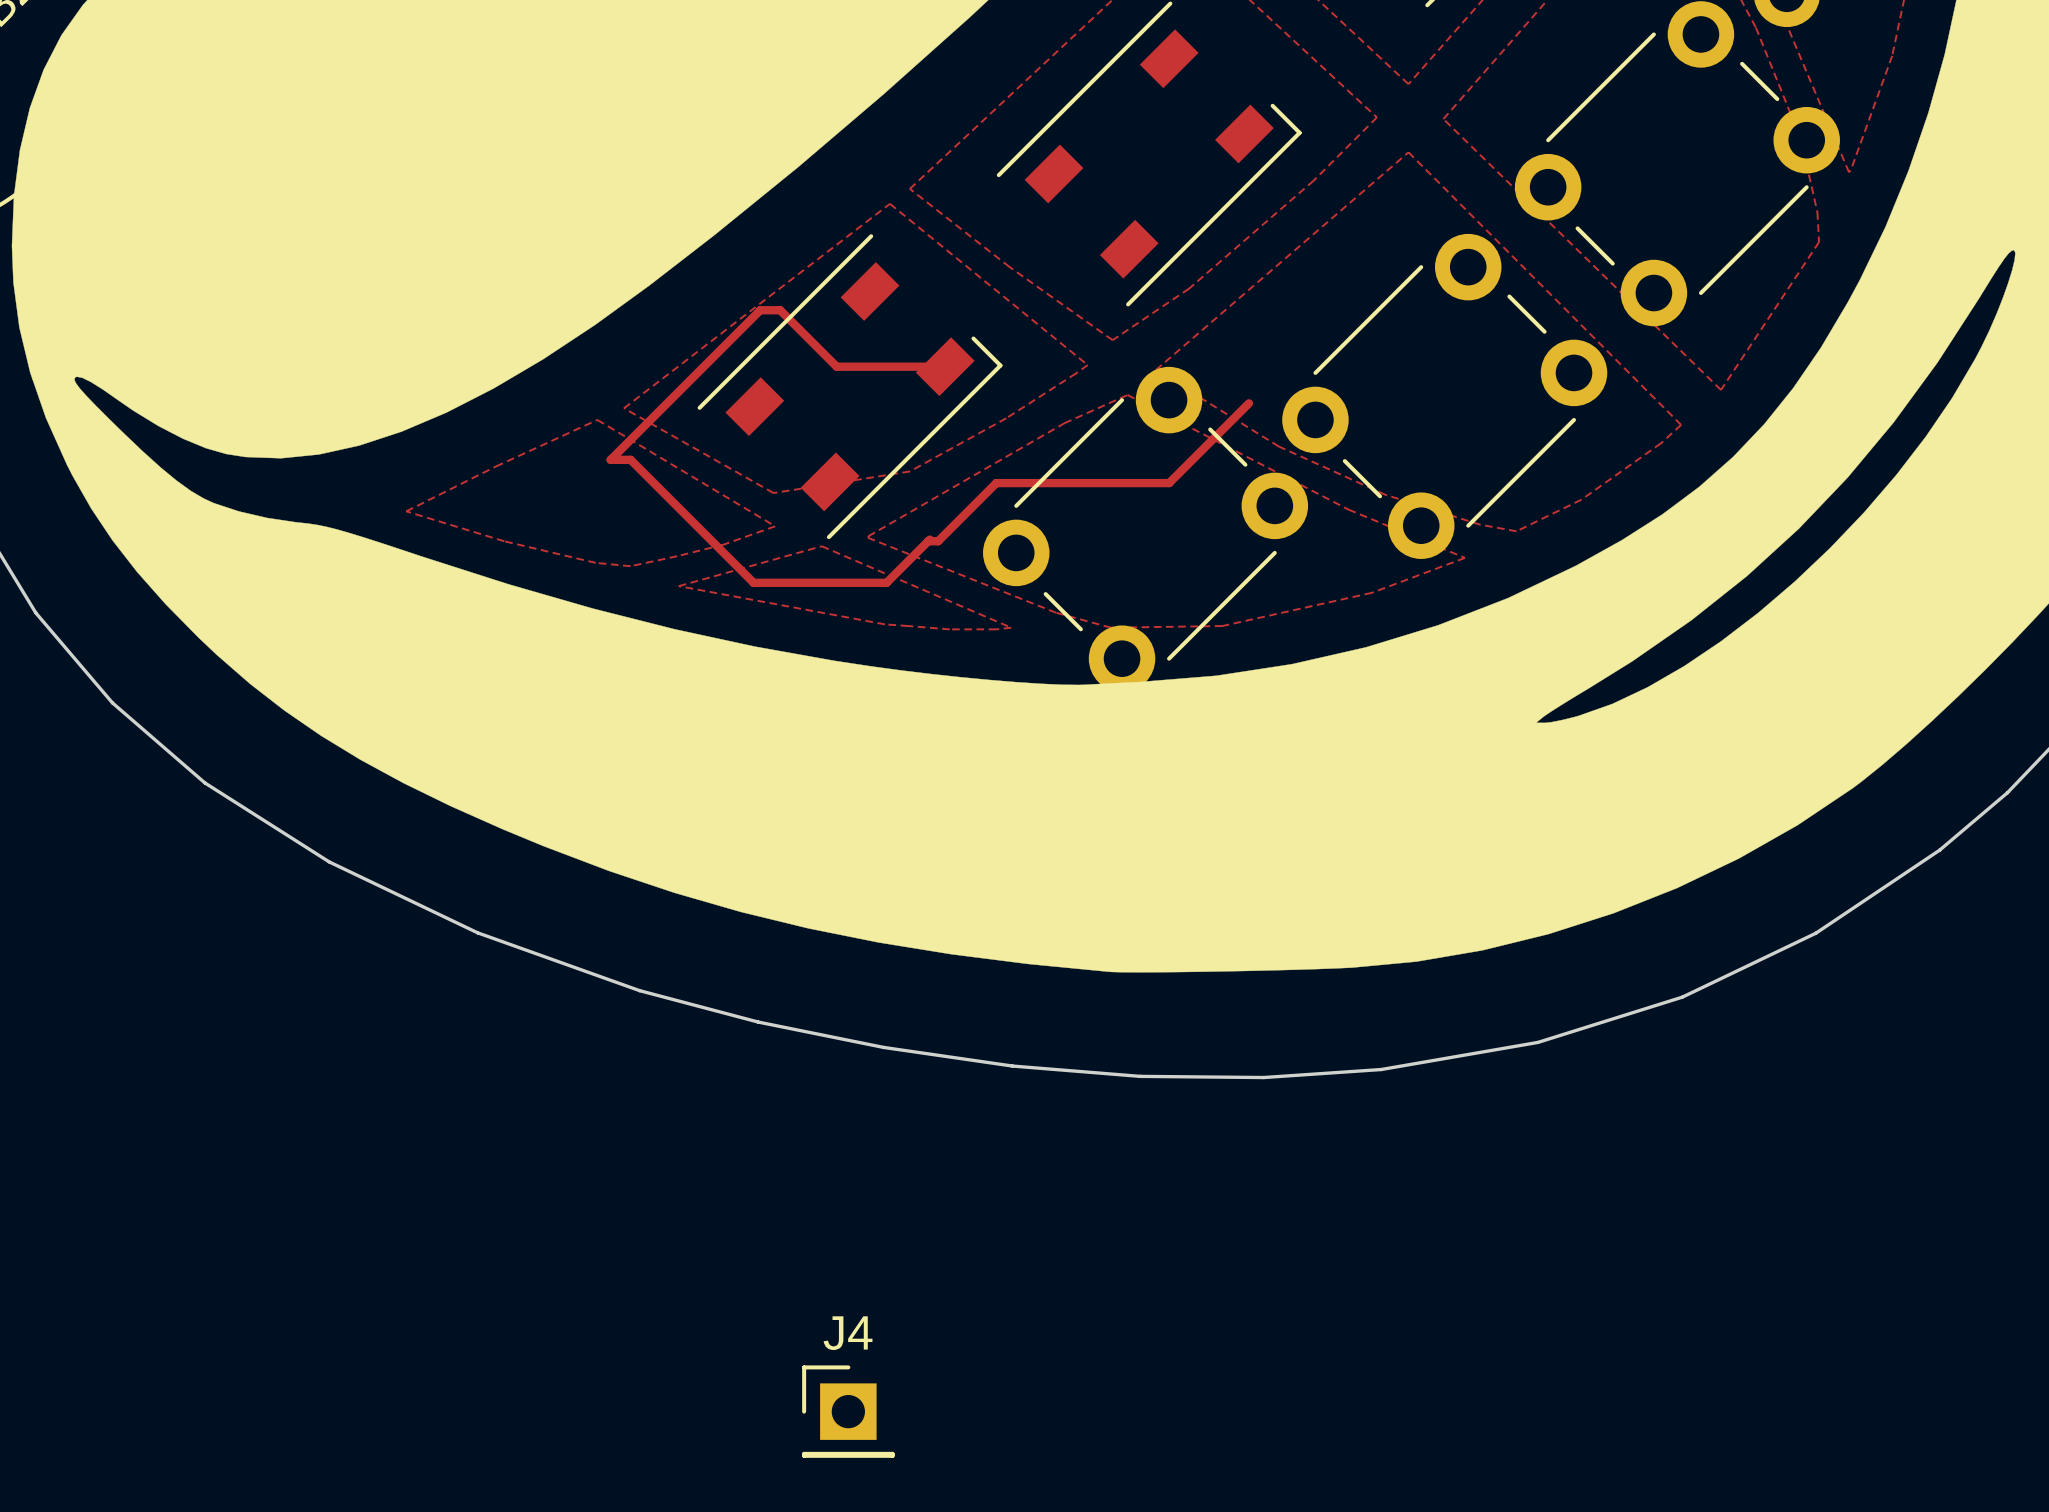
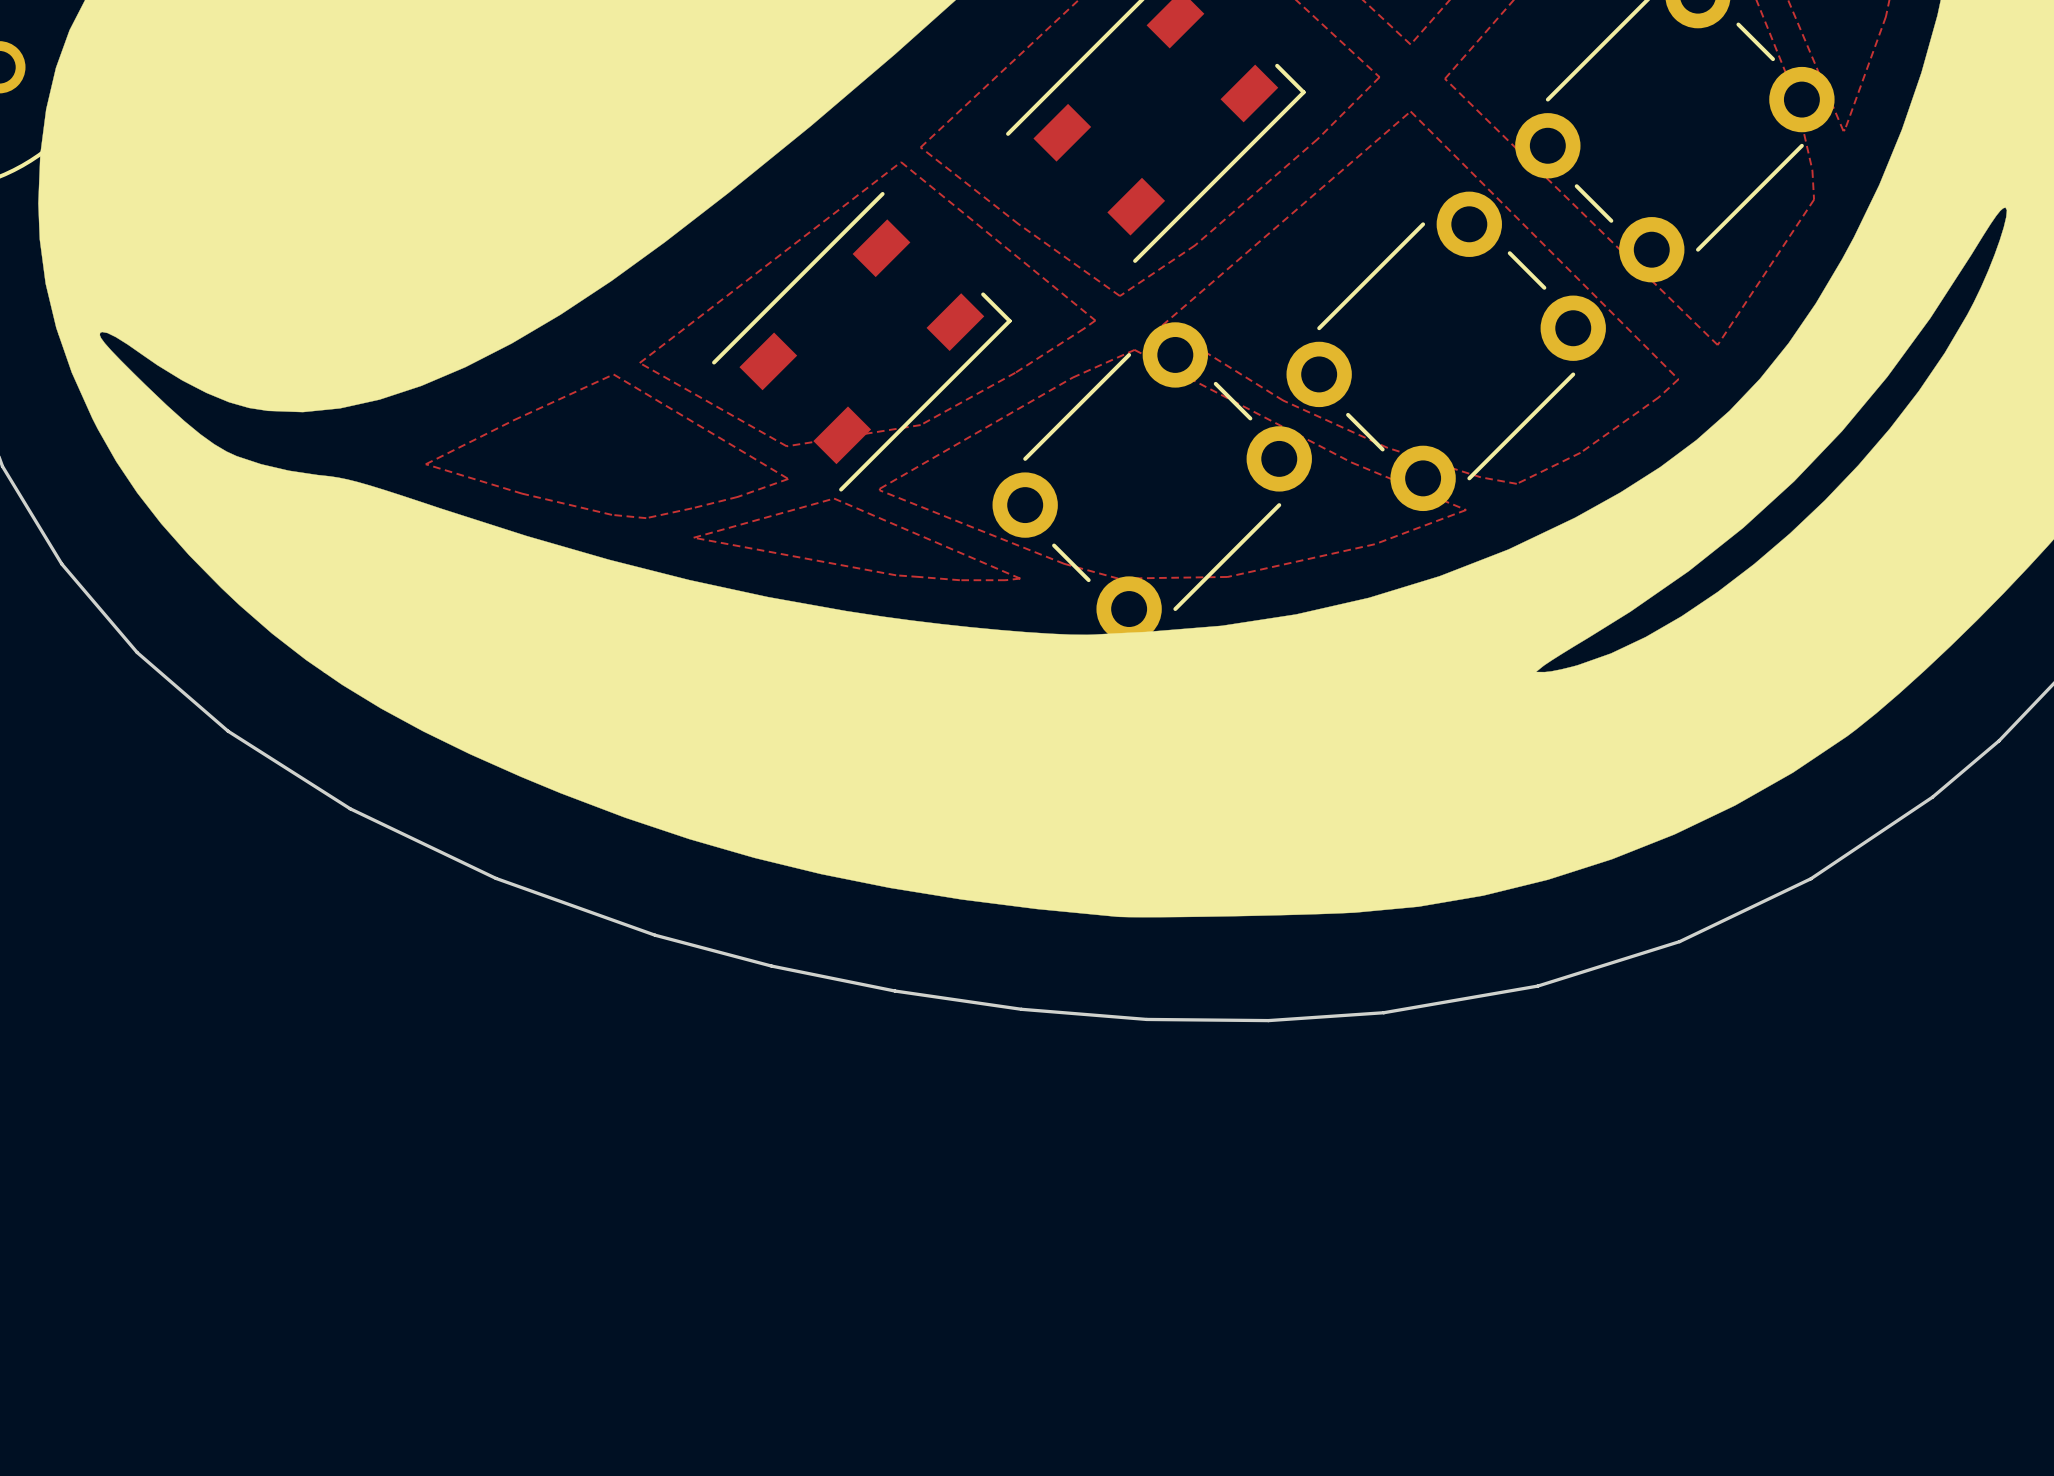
track: (945, 366) (836, 366) (780, 310) (760, 310) (610, 459) (630, 459) (753, 582) (886, 582) (929, 539) -> none
track: (1248, 403) (1169, 483) (996, 483) (938, 541) (928, 541) -> none
J4: (848, 1411) -> none

